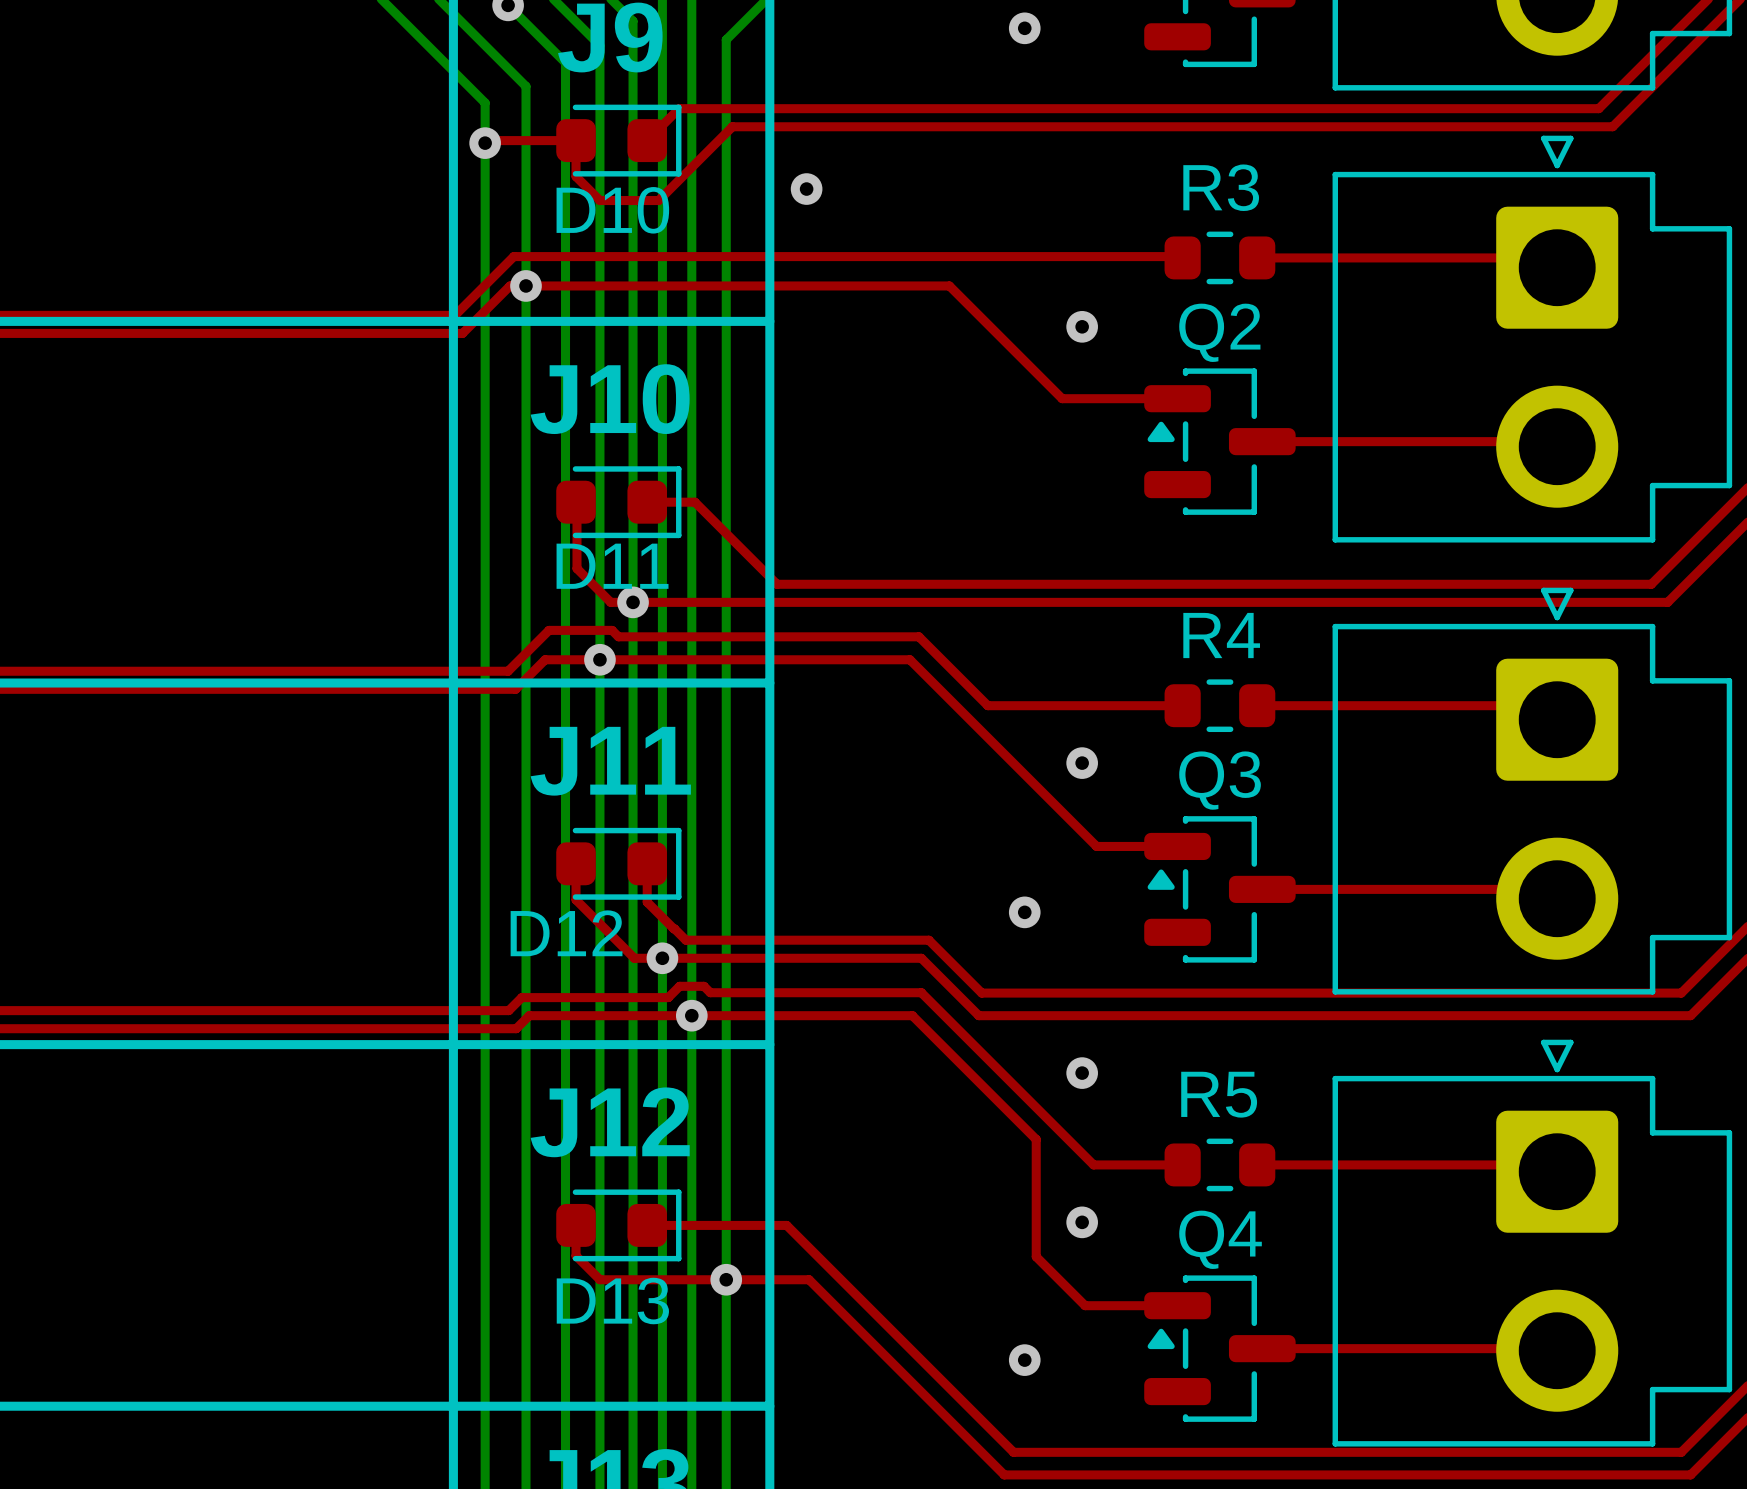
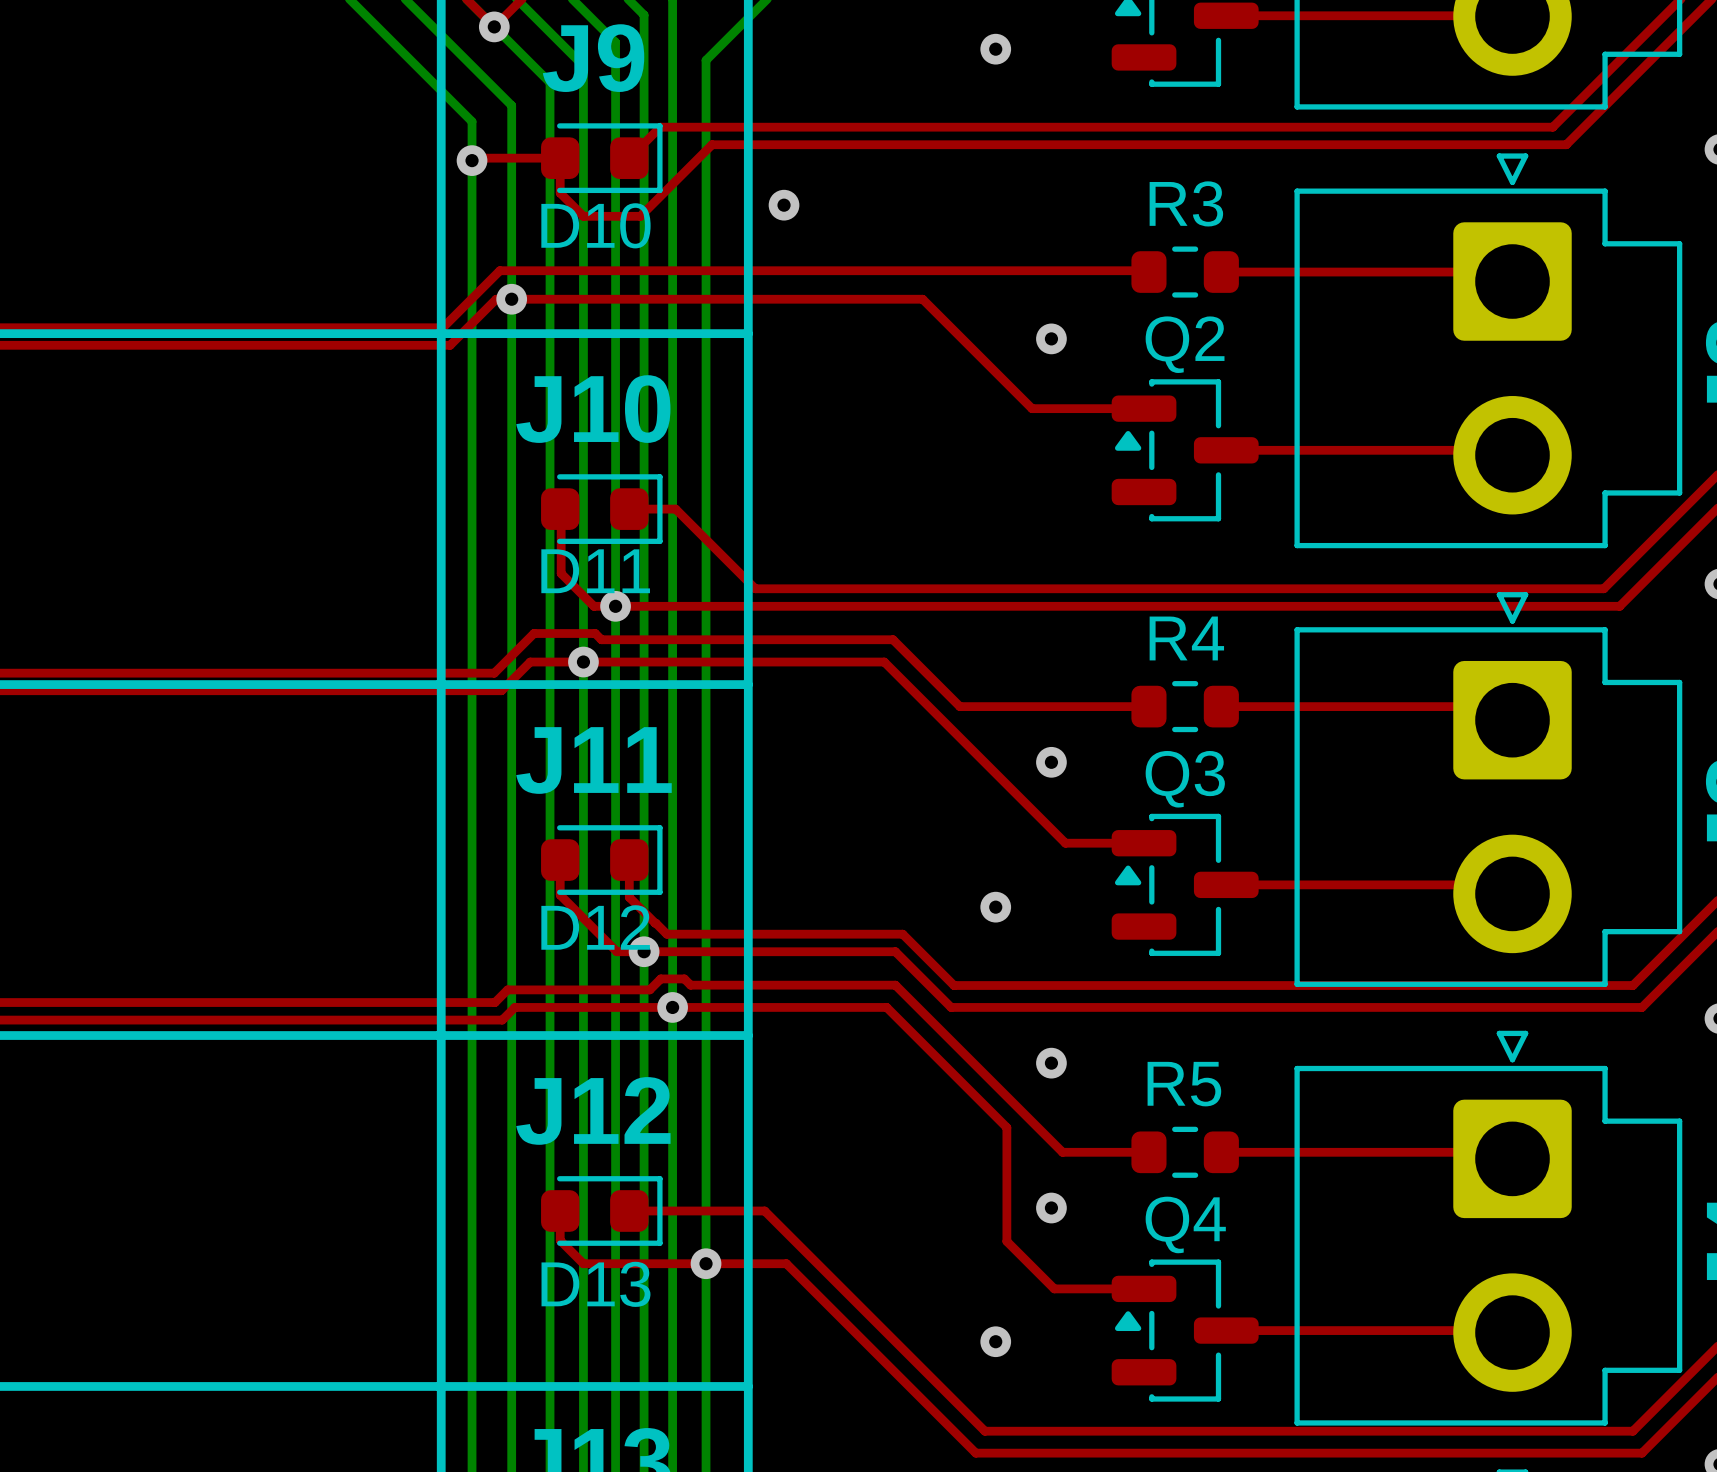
D12 name position: D12 (566, 933) -> D12 (595, 927)

